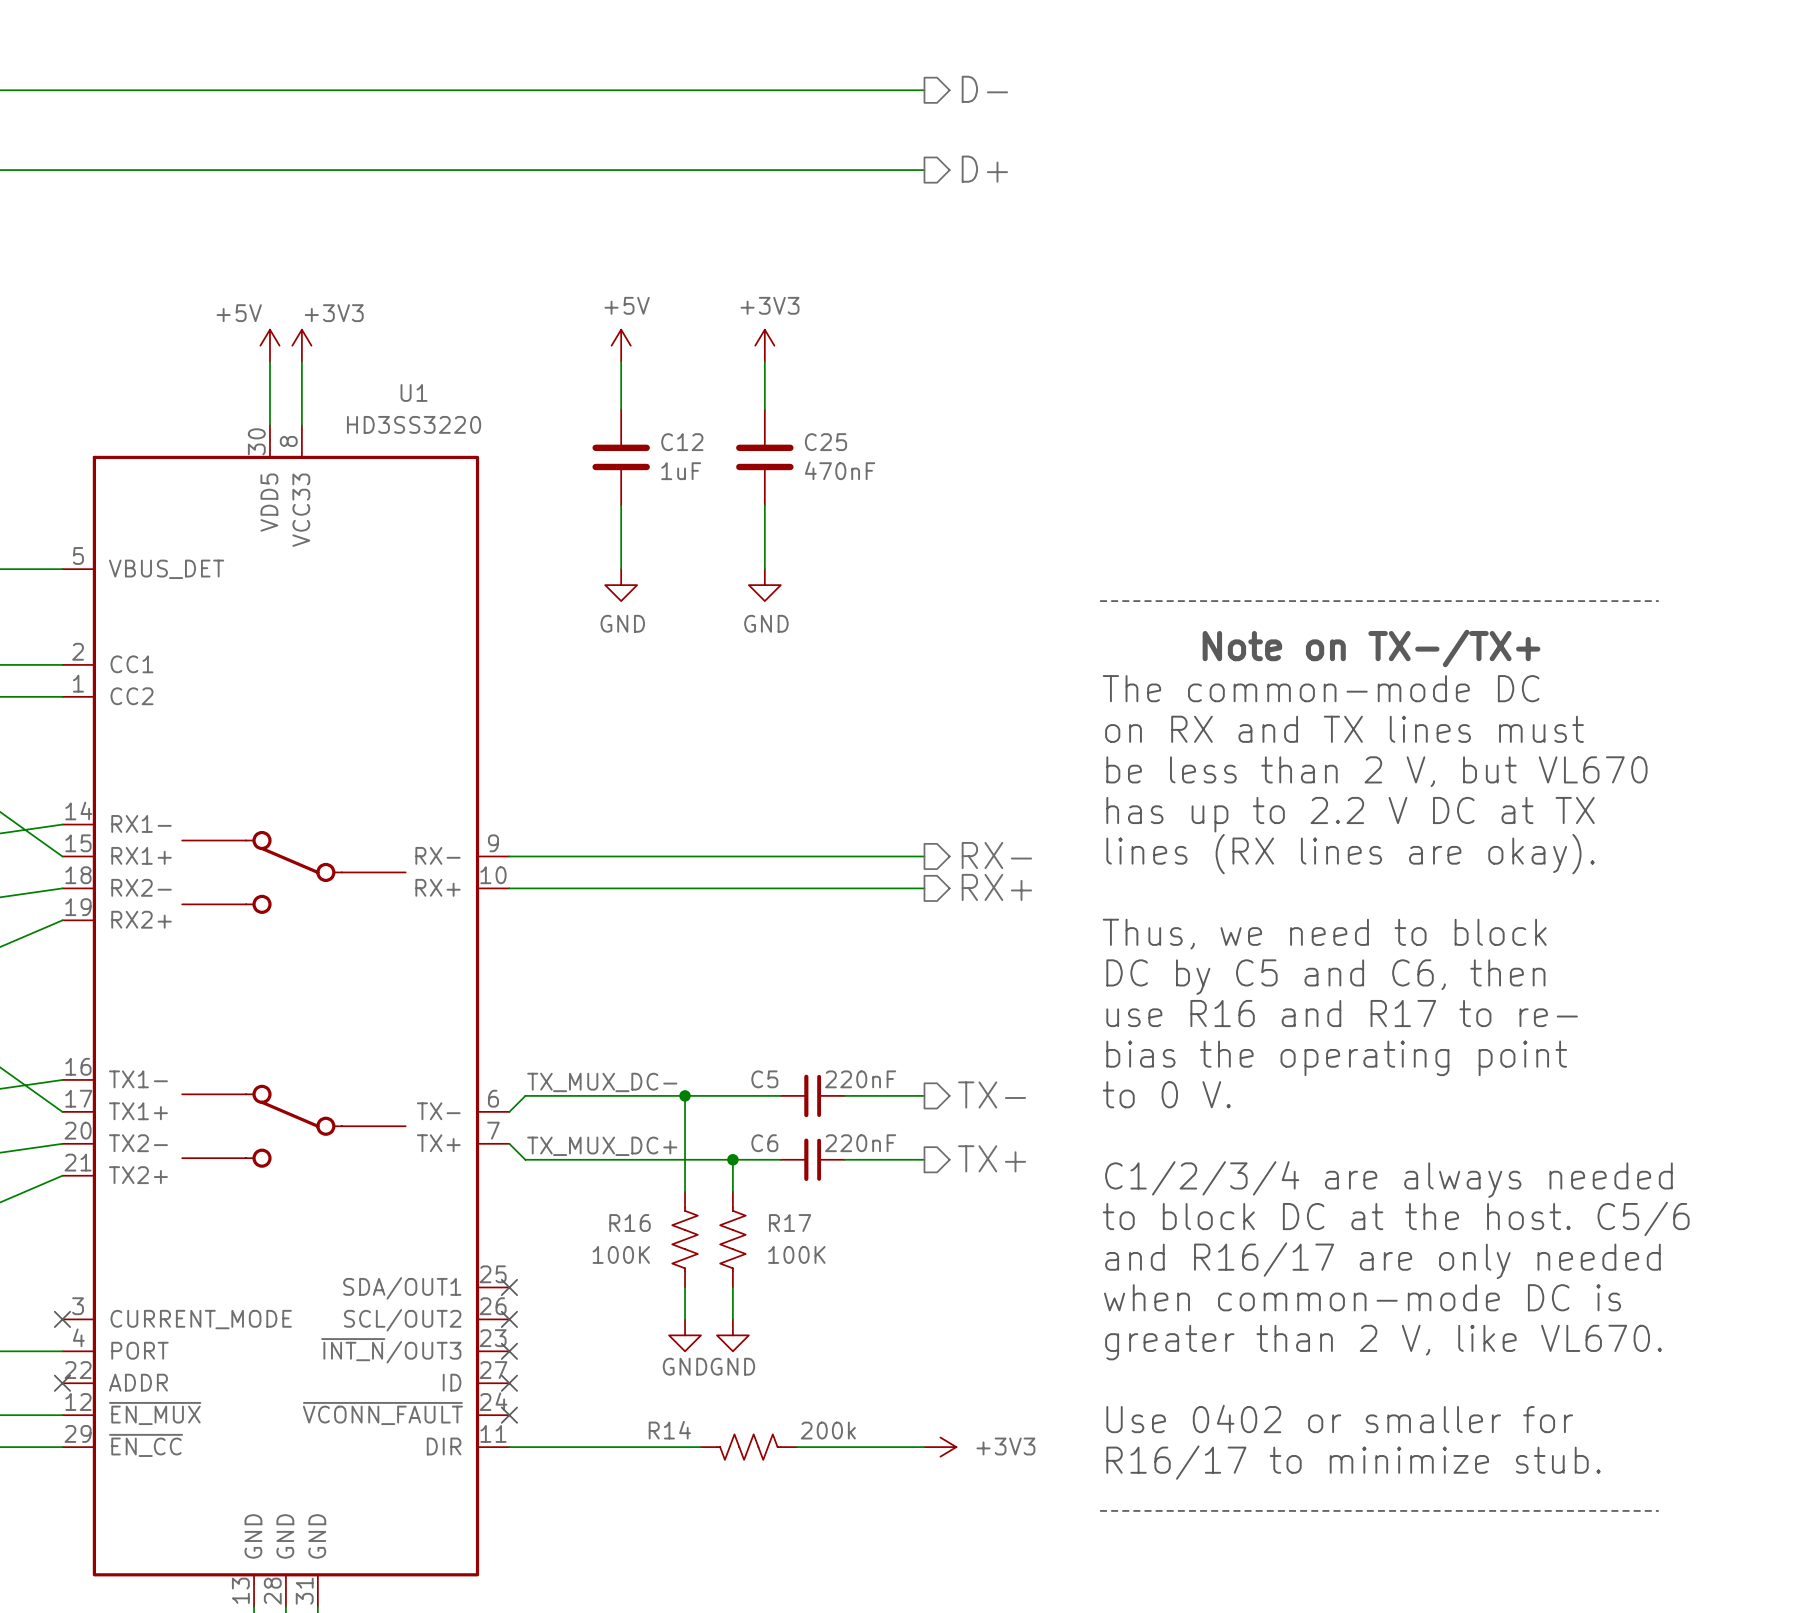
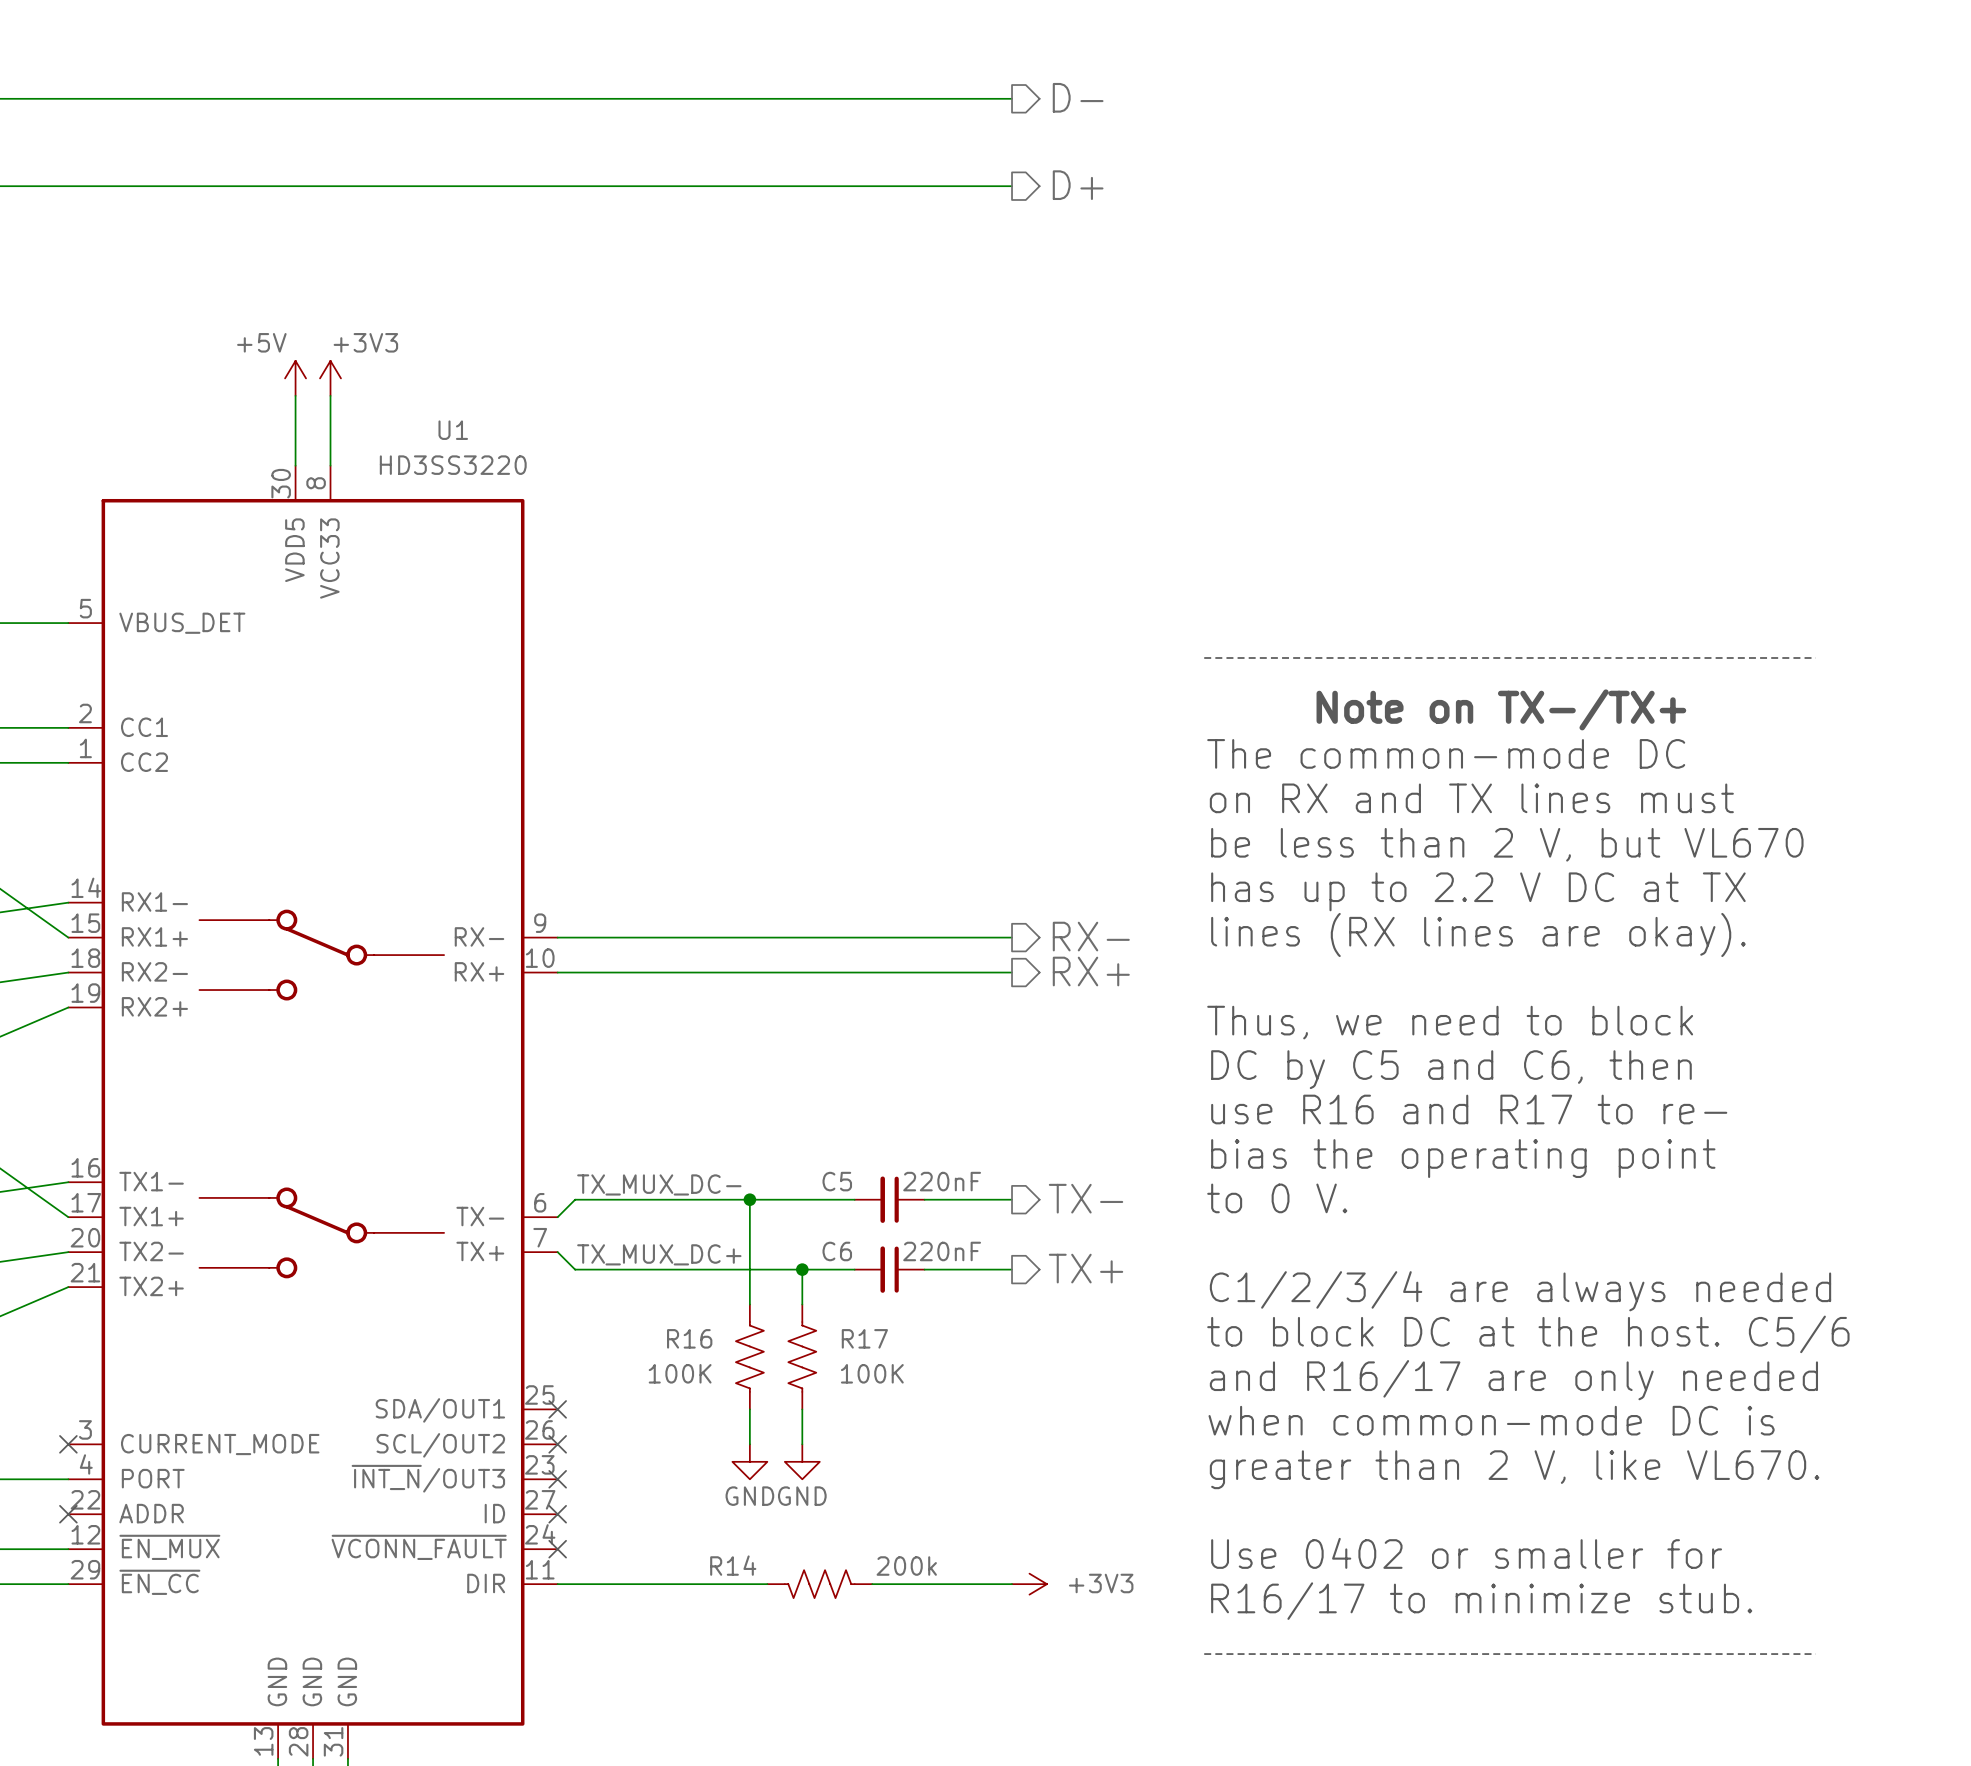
power symbol: +5V (621, 345) -> none
power symbol: +3V3 (764, 345) -> none
wire: (621, 361) (621, 409) -> none
wire: (764, 361) (764, 409) -> none
C12: 1uF (621, 457) -> none
C25: 470nF (764, 457) -> none
wire: (621, 505) (621, 569) -> none
wire: (764, 505) (764, 569) -> none
power symbol: GND (621, 585) -> none
power symbol: GND (764, 585) -> none

